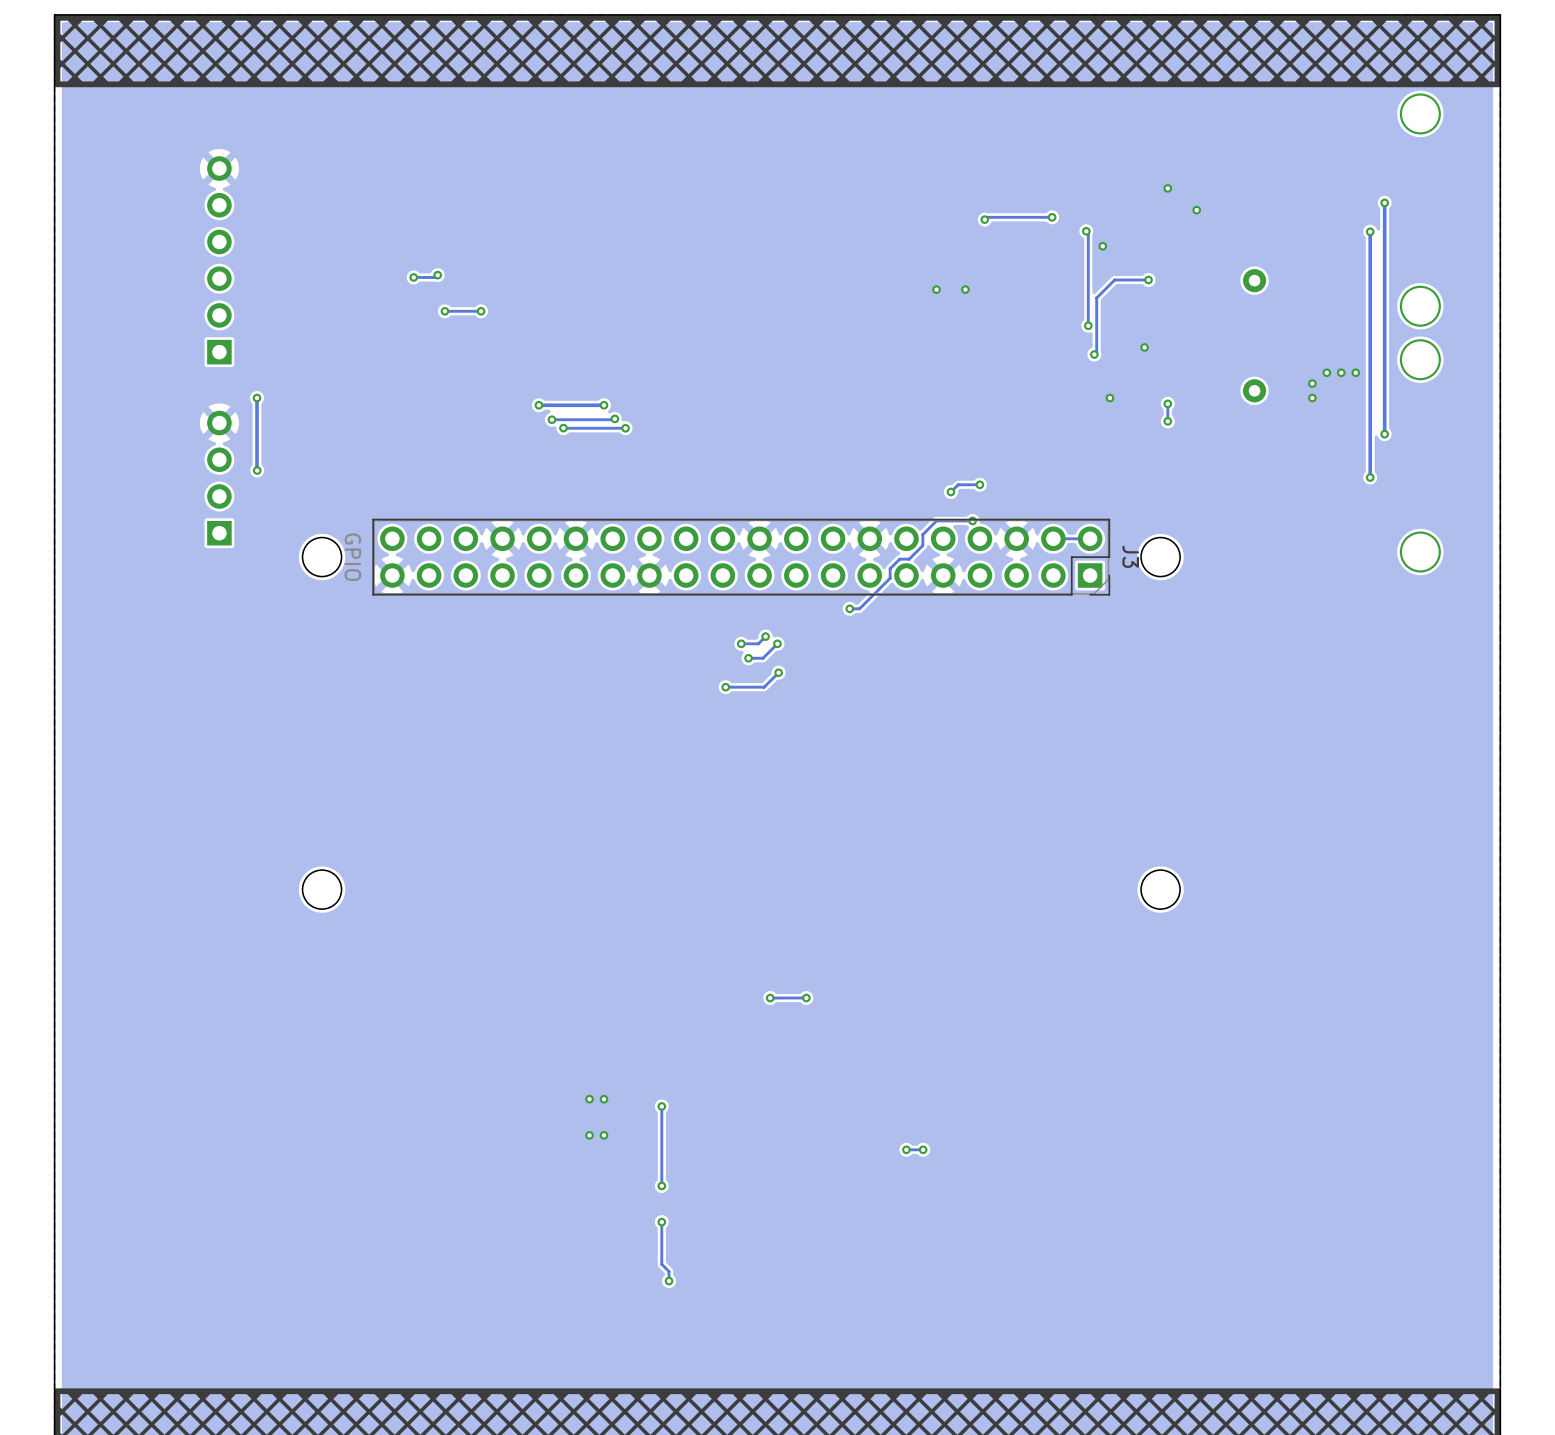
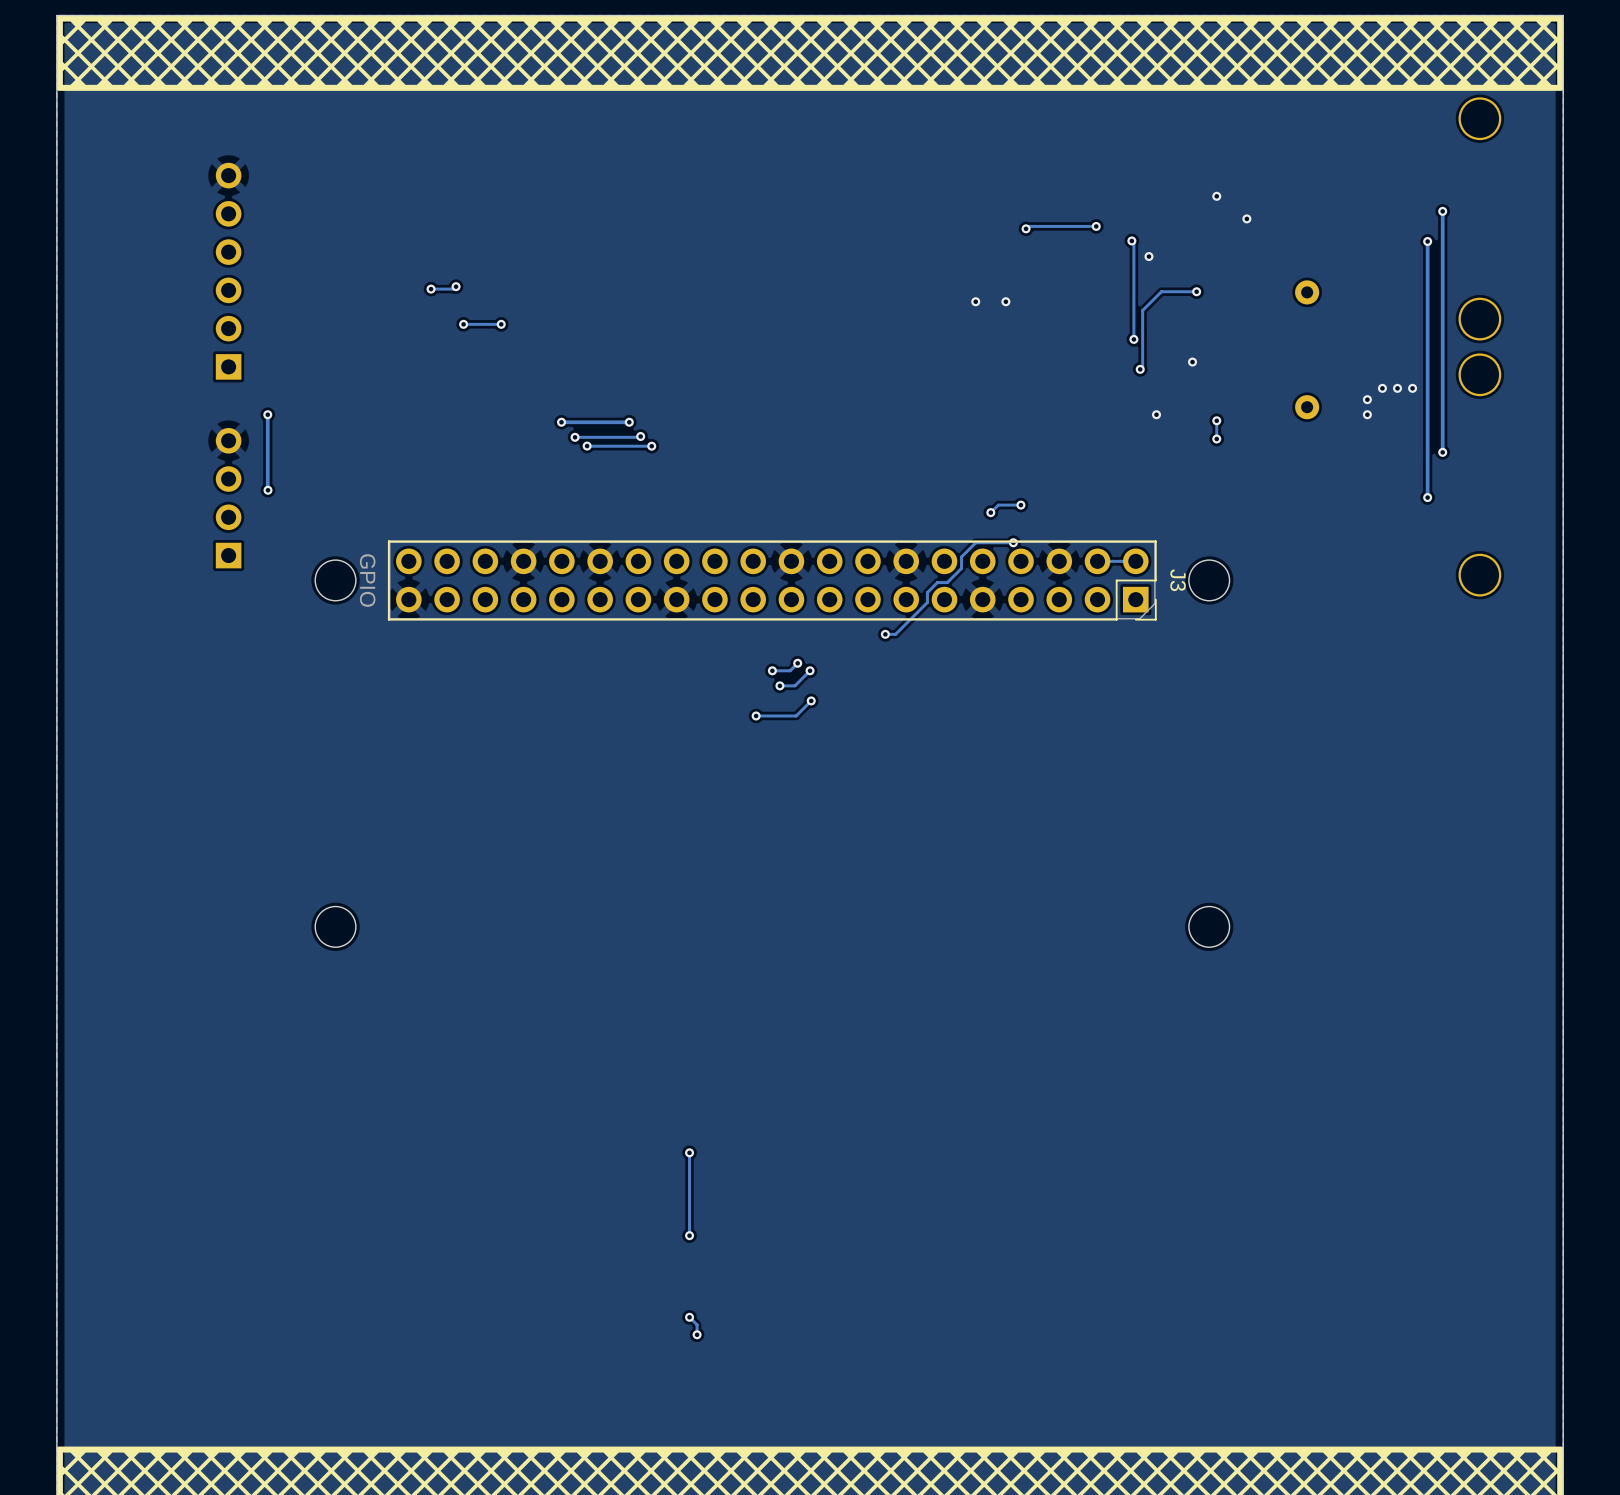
via: (770, 998) -> none
track: (806, 998) (770, 998) -> none
via: (806, 998) -> none
via: (589, 1099) -> none
via: (603, 1099) -> none
via: (589, 1135) -> none
via: (603, 1135) -> none
via: (906, 1149) -> none
track: (923, 1149) (906, 1149) -> none
via: (923, 1149) -> none
track: (661, 1222) (661, 1264) -> none
via position: (661, 1222) -> (689, 1317)

